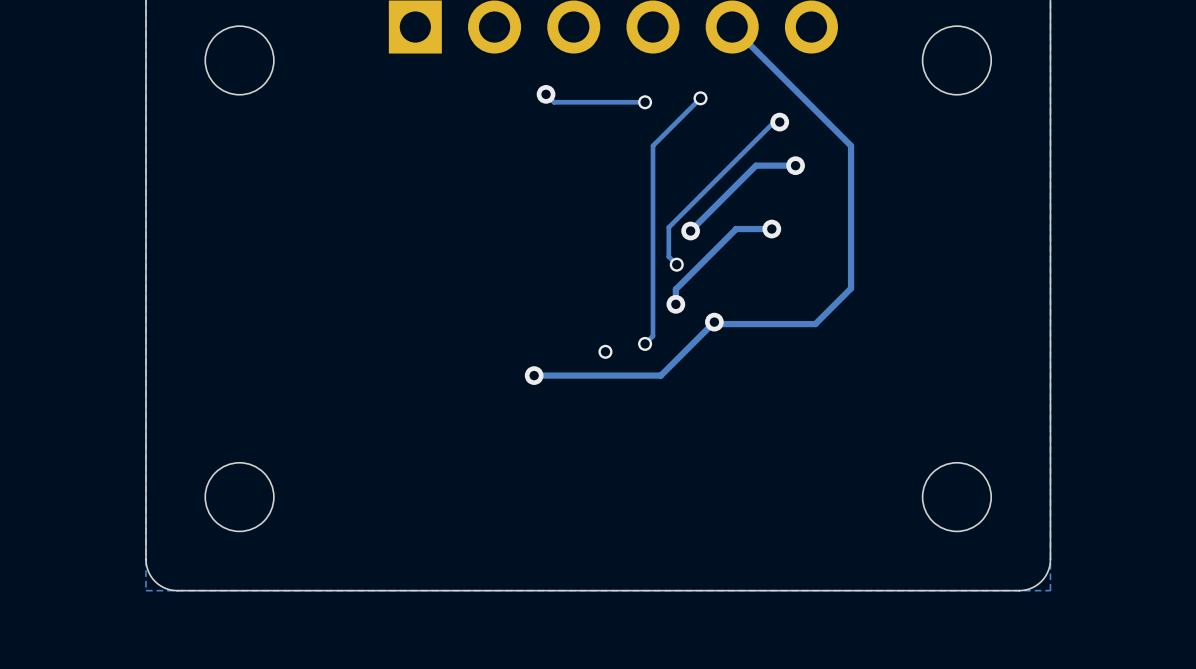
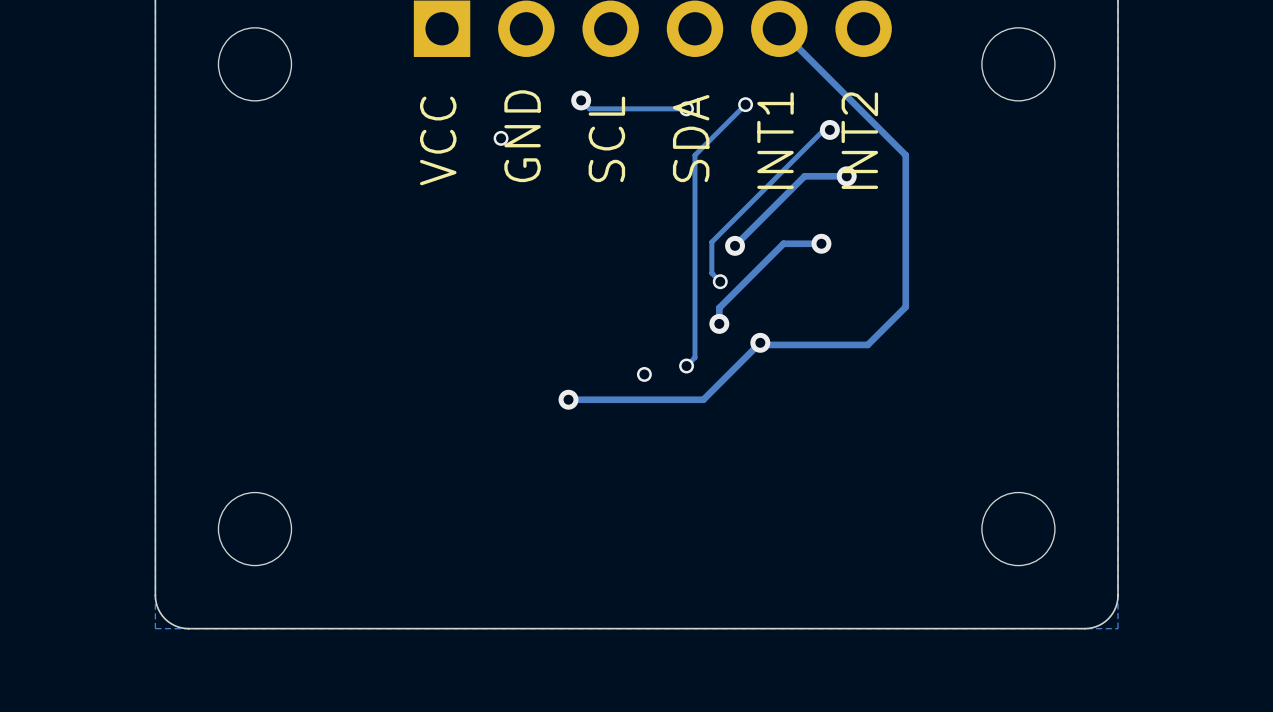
text: none -> GND (522, 136)
via: none -> (501, 138)
text: none -> SCL (606, 139)
text: none -> SDA (691, 138)
text: none -> VCC (438, 140)
text: none -> INT1 (775, 140)
text: none -> INT2 (859, 140)

